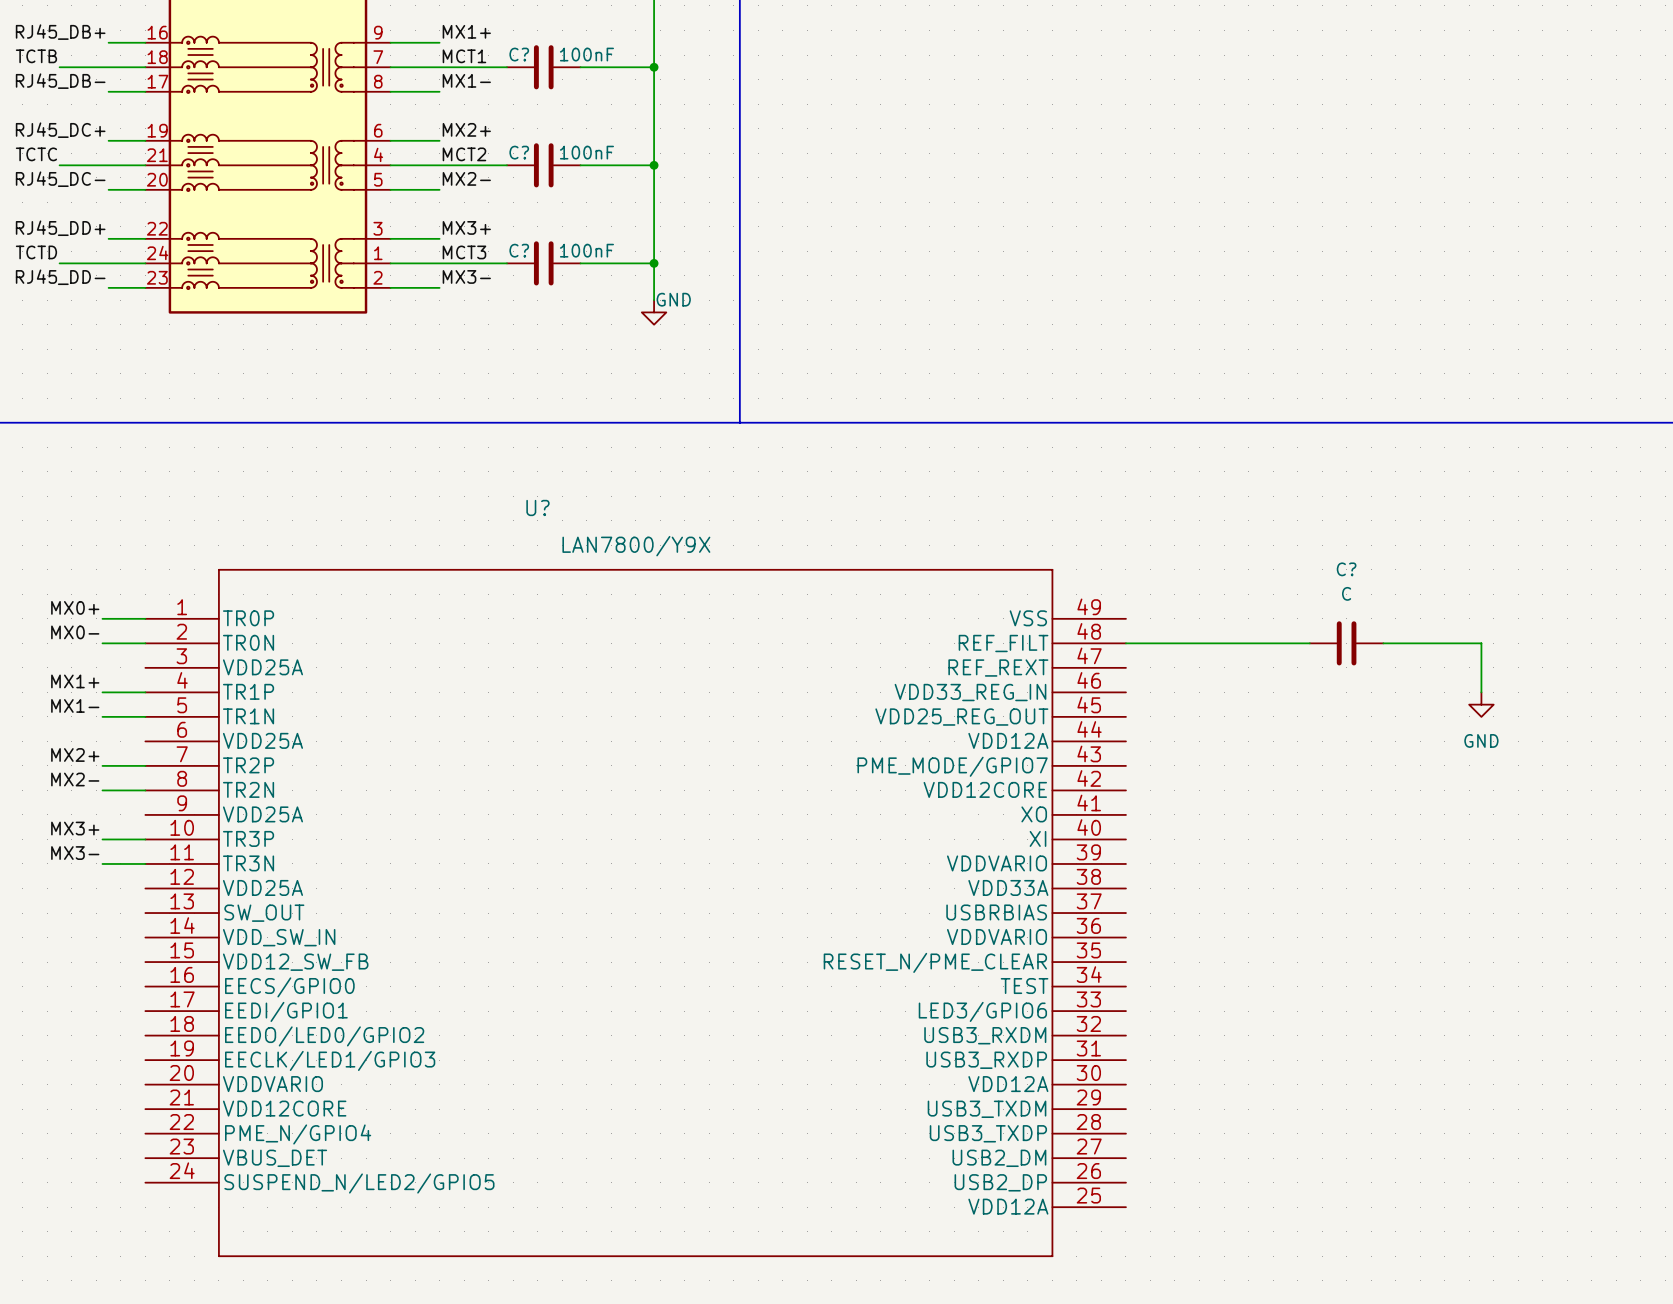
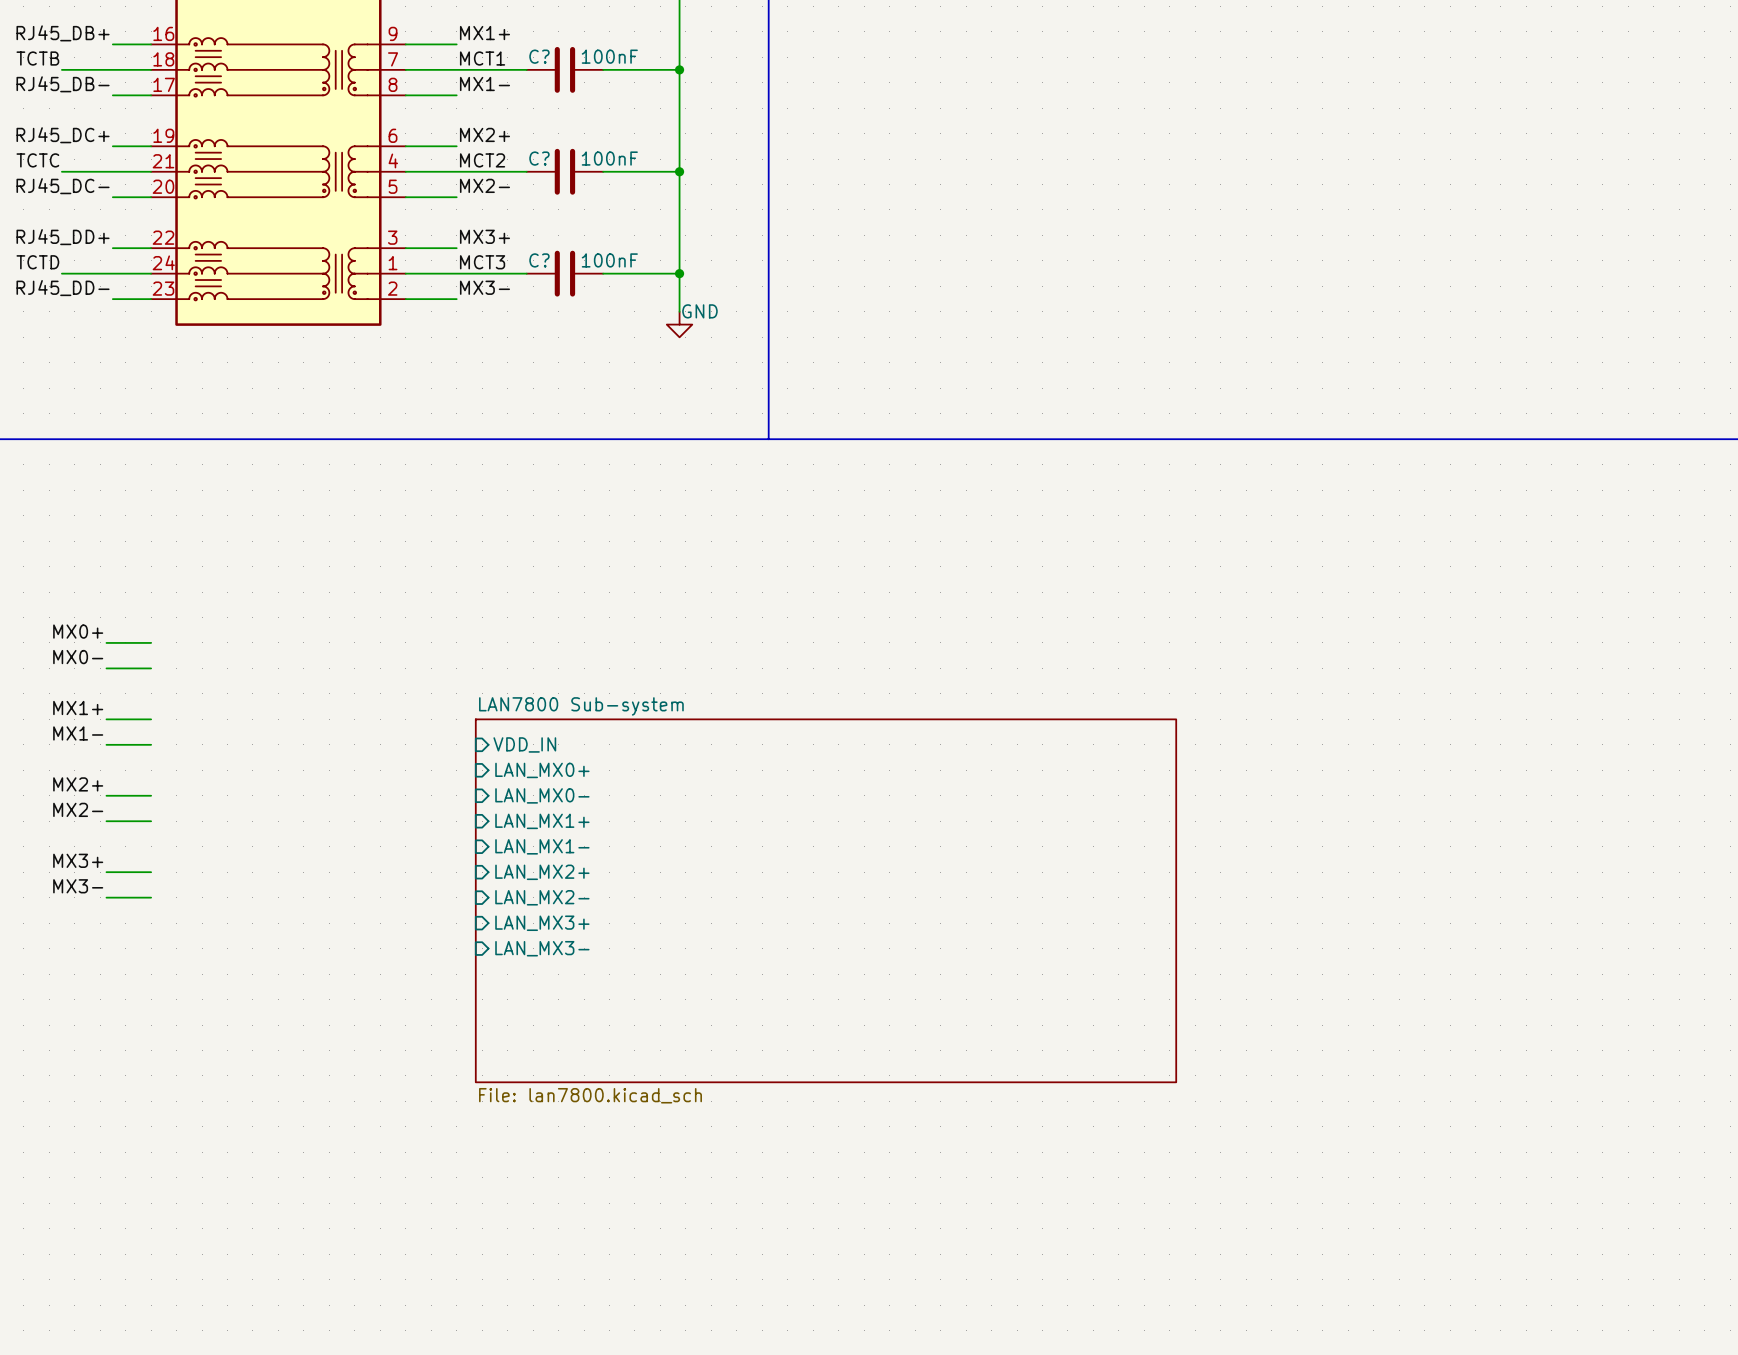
wire: (1125, 643) (1309, 643) -> none
C?: C (1346, 643) -> none
wire: (1383, 643) (1481, 643) (1481, 692) -> none
power symbol: GND (1481, 704) -> none
sheet pin: none -> VDD_IN (524, 744)
sheet pin: none -> LAN_MX0+ (542, 770)
sheet pin: none -> LAN_MX0- (542, 795)
sheet pin: none -> LAN_MX1+ (542, 821)
sheet pin: none -> LAN_MX1- (542, 846)
sheet pin: none -> LAN_MX2+ (542, 872)
sheet pin: none -> LAN_MX2- (542, 897)
sheet LAN7800 Sub-system: none -> File: lan7800.kicad_sch (826, 900)
sheet pin: none -> LAN_MX3+ (542, 923)
sheet pin: none -> LAN_MX3- (542, 948)
U?: LAN7800/Y9X (635, 913) -> none

